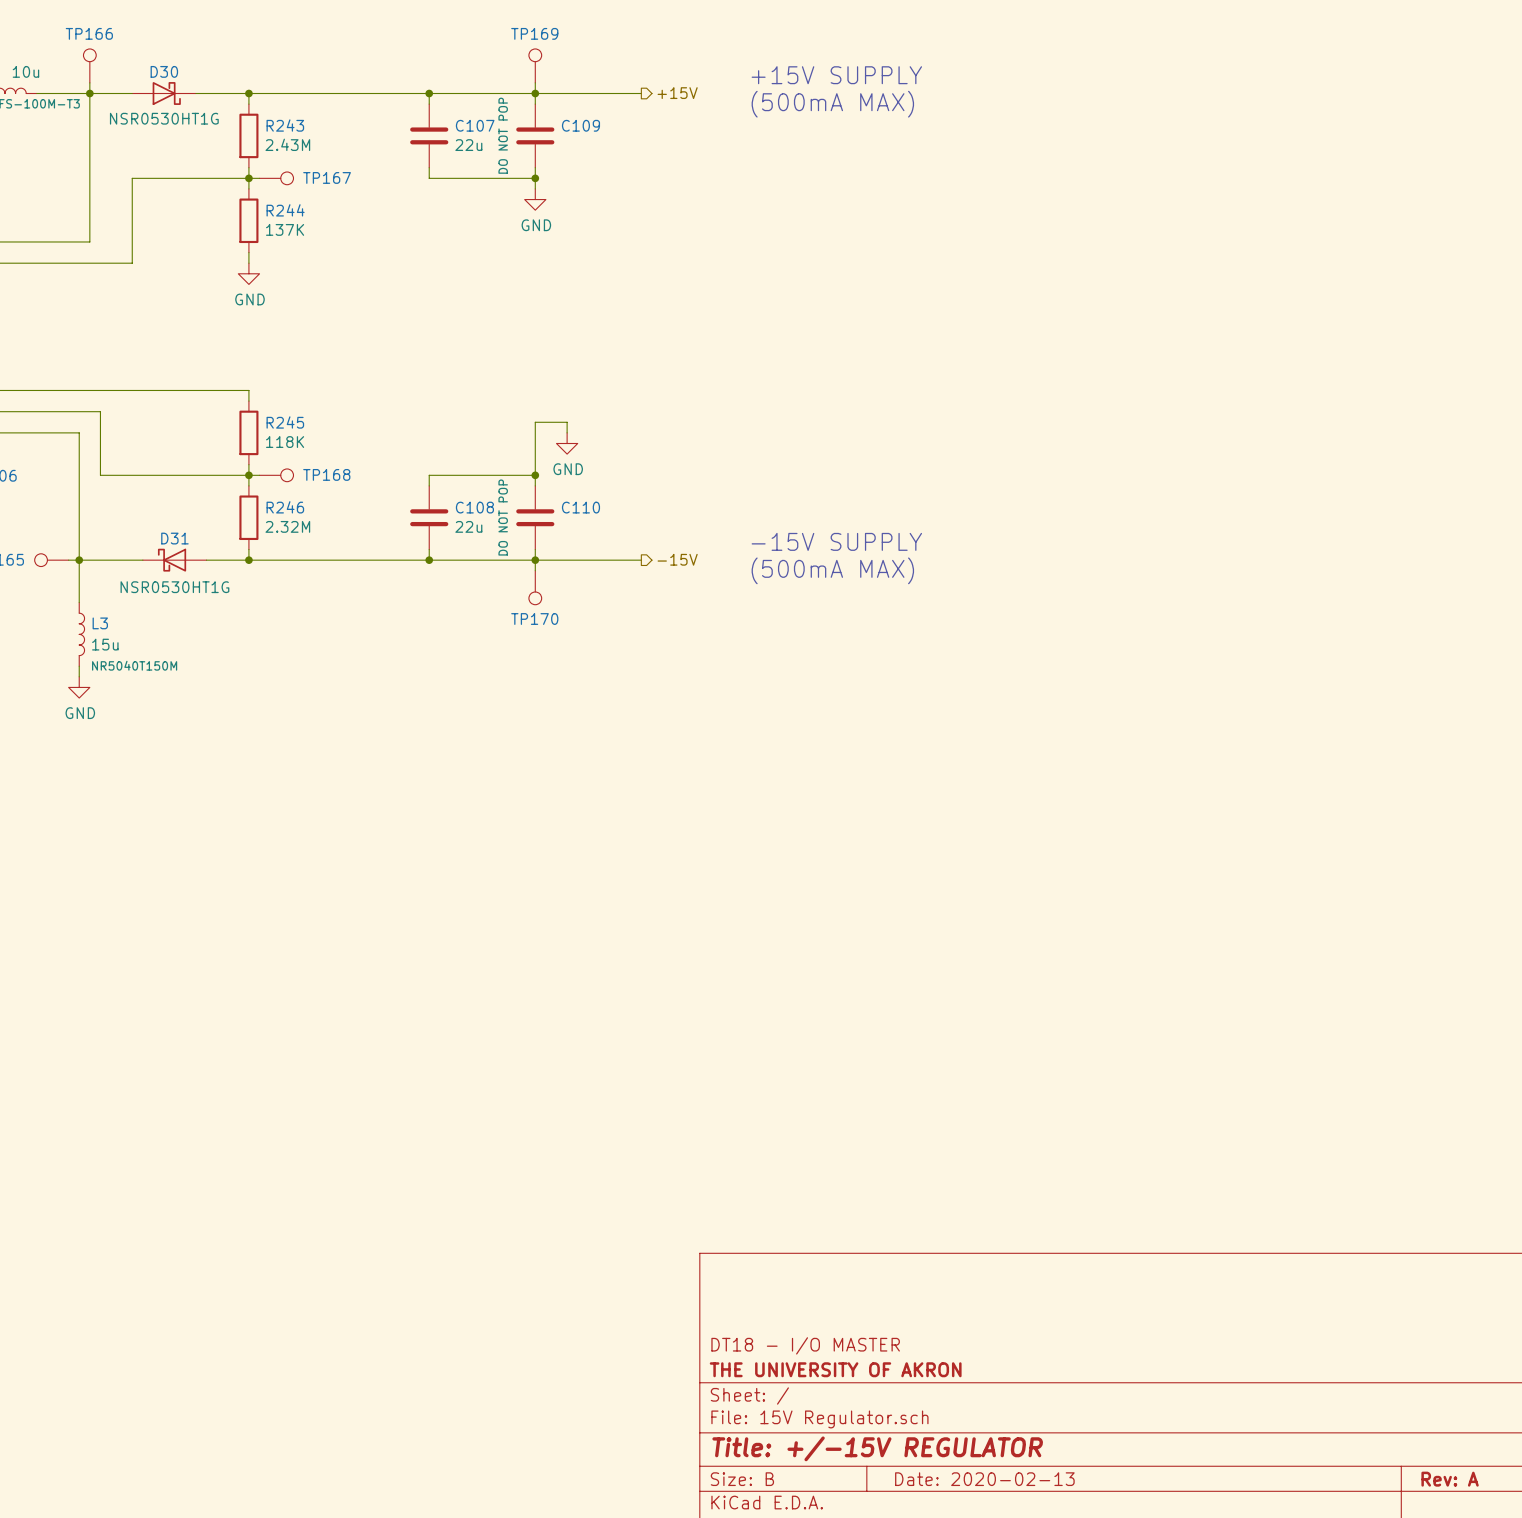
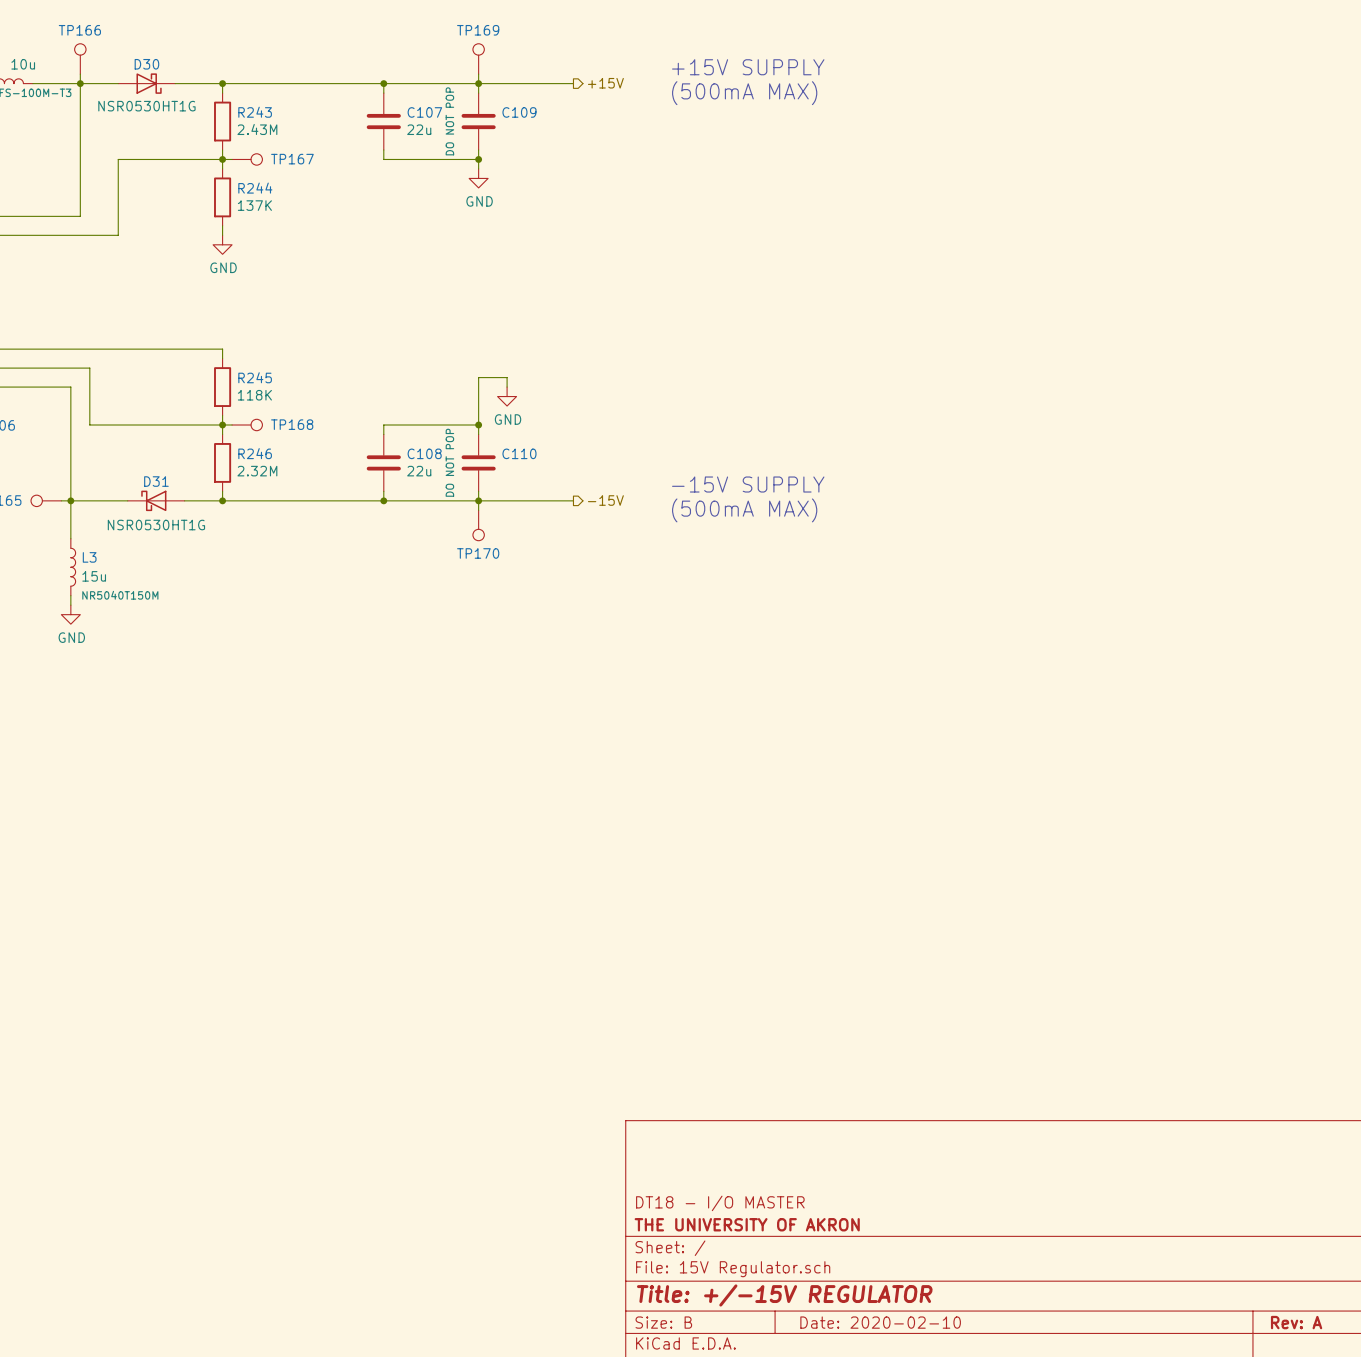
title block: Date: 2020-02-13 (984, 1479) -> Date: 2020-02-10 (880, 1322)

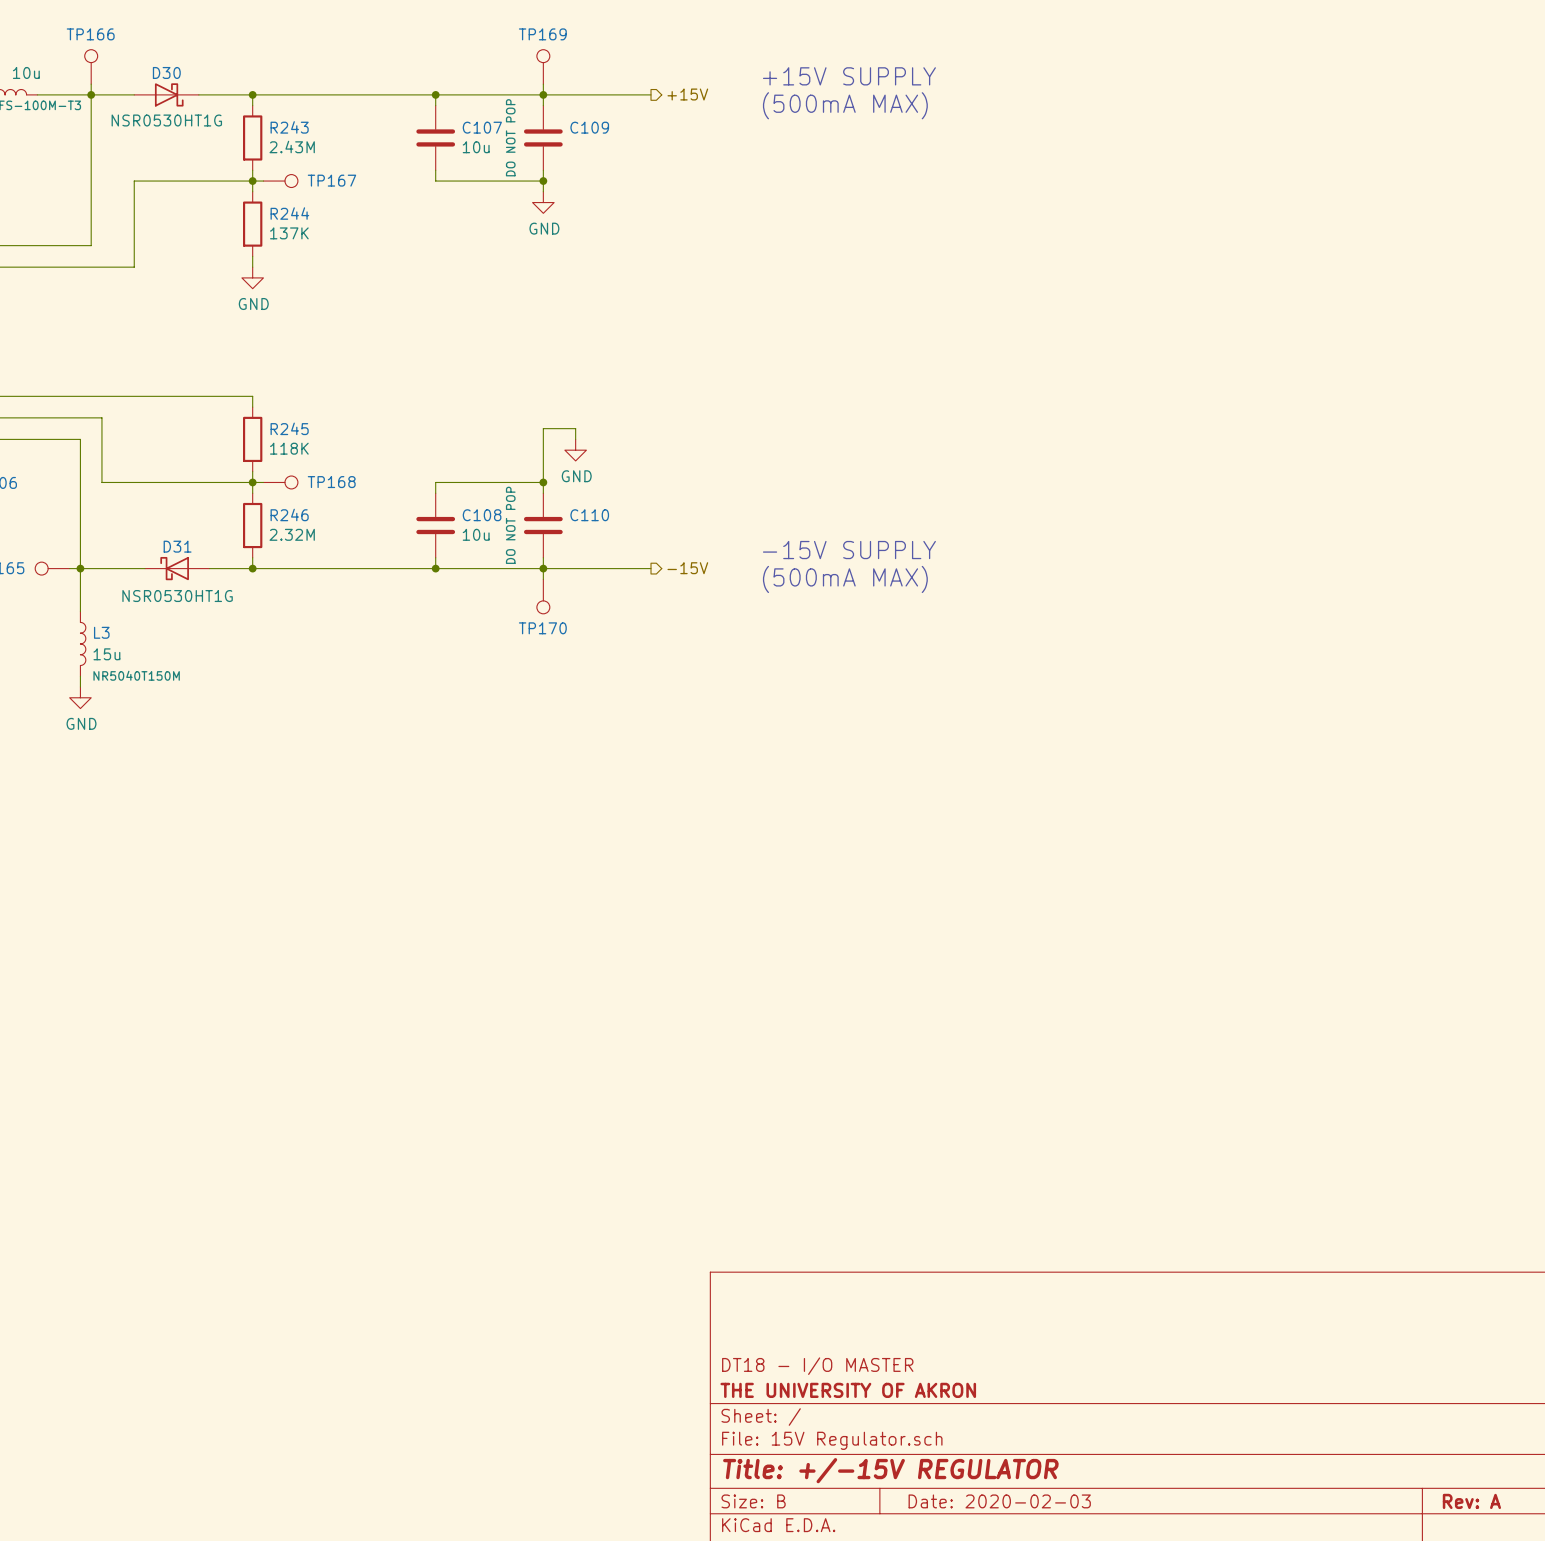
C107 value: 22u (419, 129) -> 10u (476, 147)
C108 value: 22u (419, 471) -> 10u (476, 534)
title block: Date: 2020-02-10 (880, 1322) -> Date: 2020-02-03 (999, 1501)

